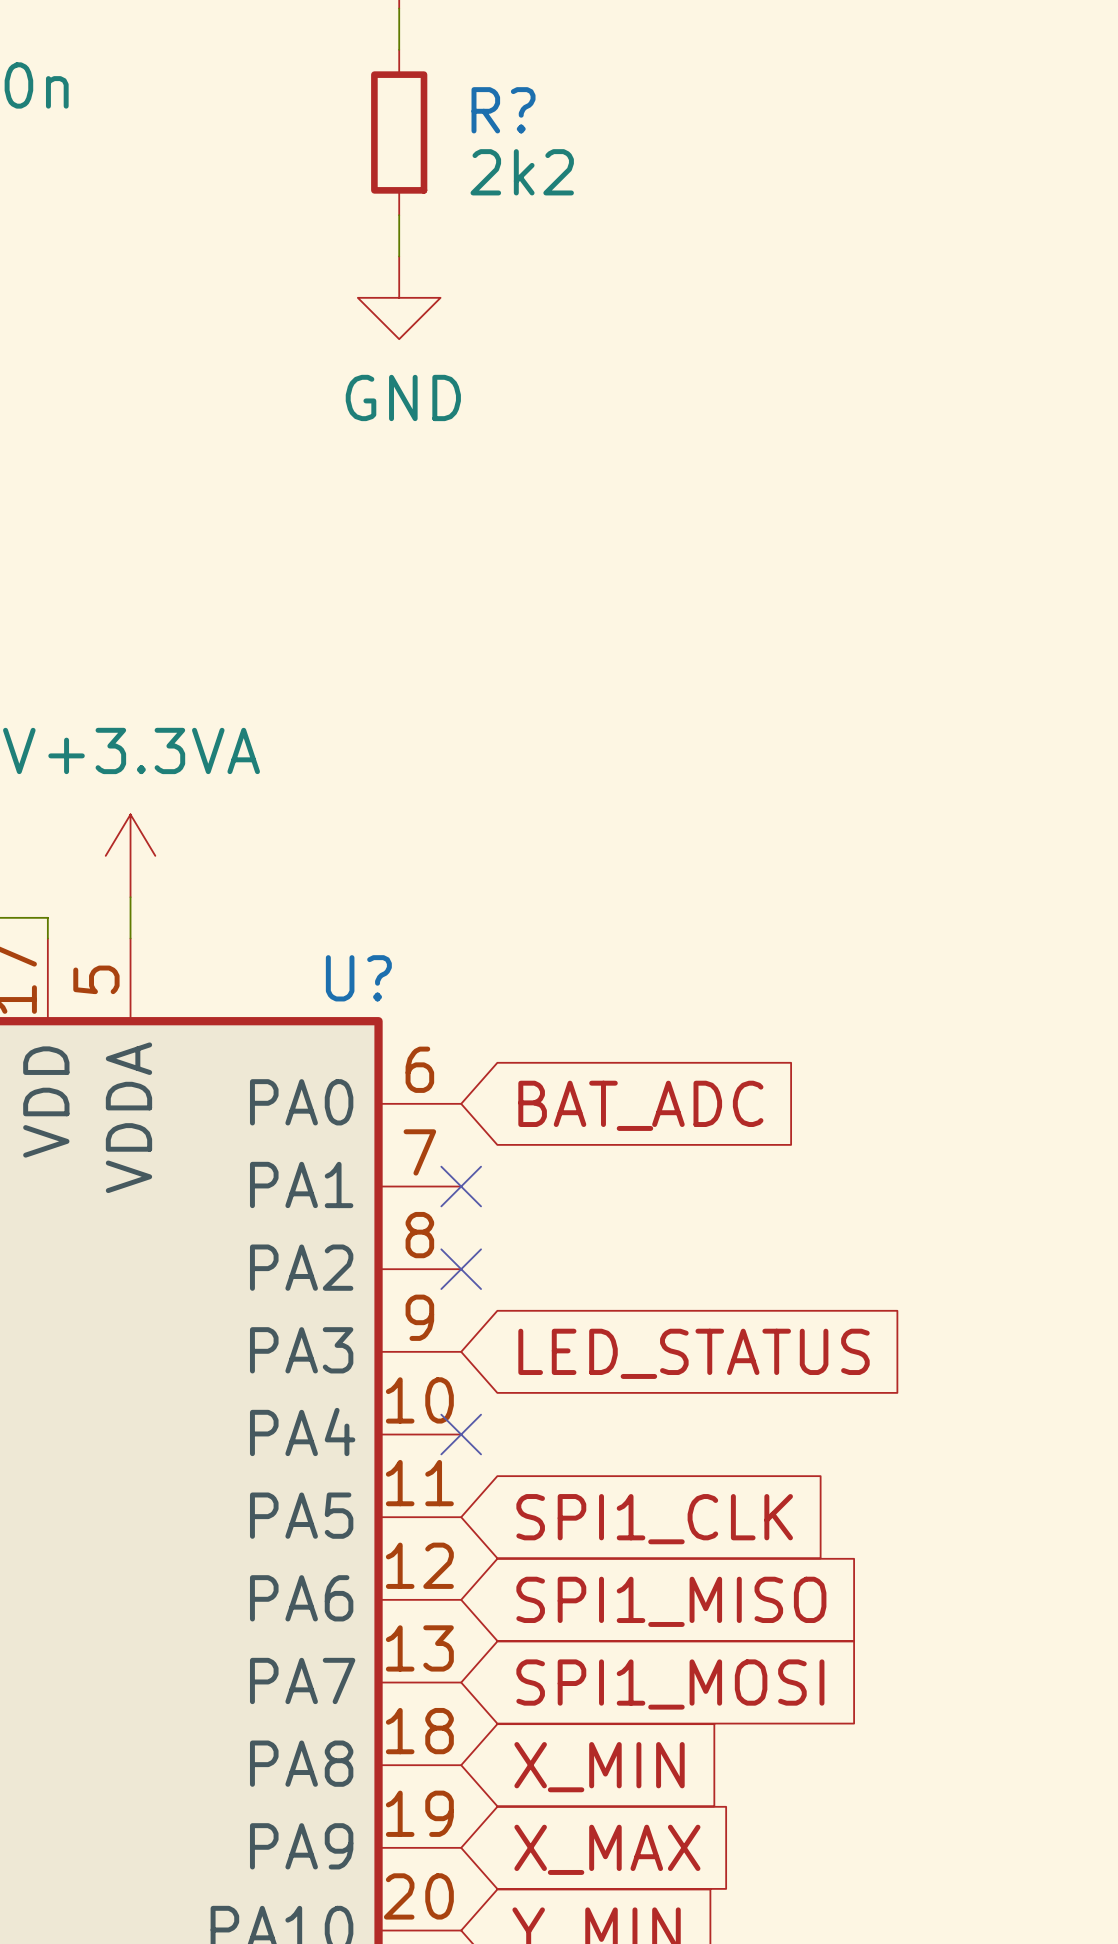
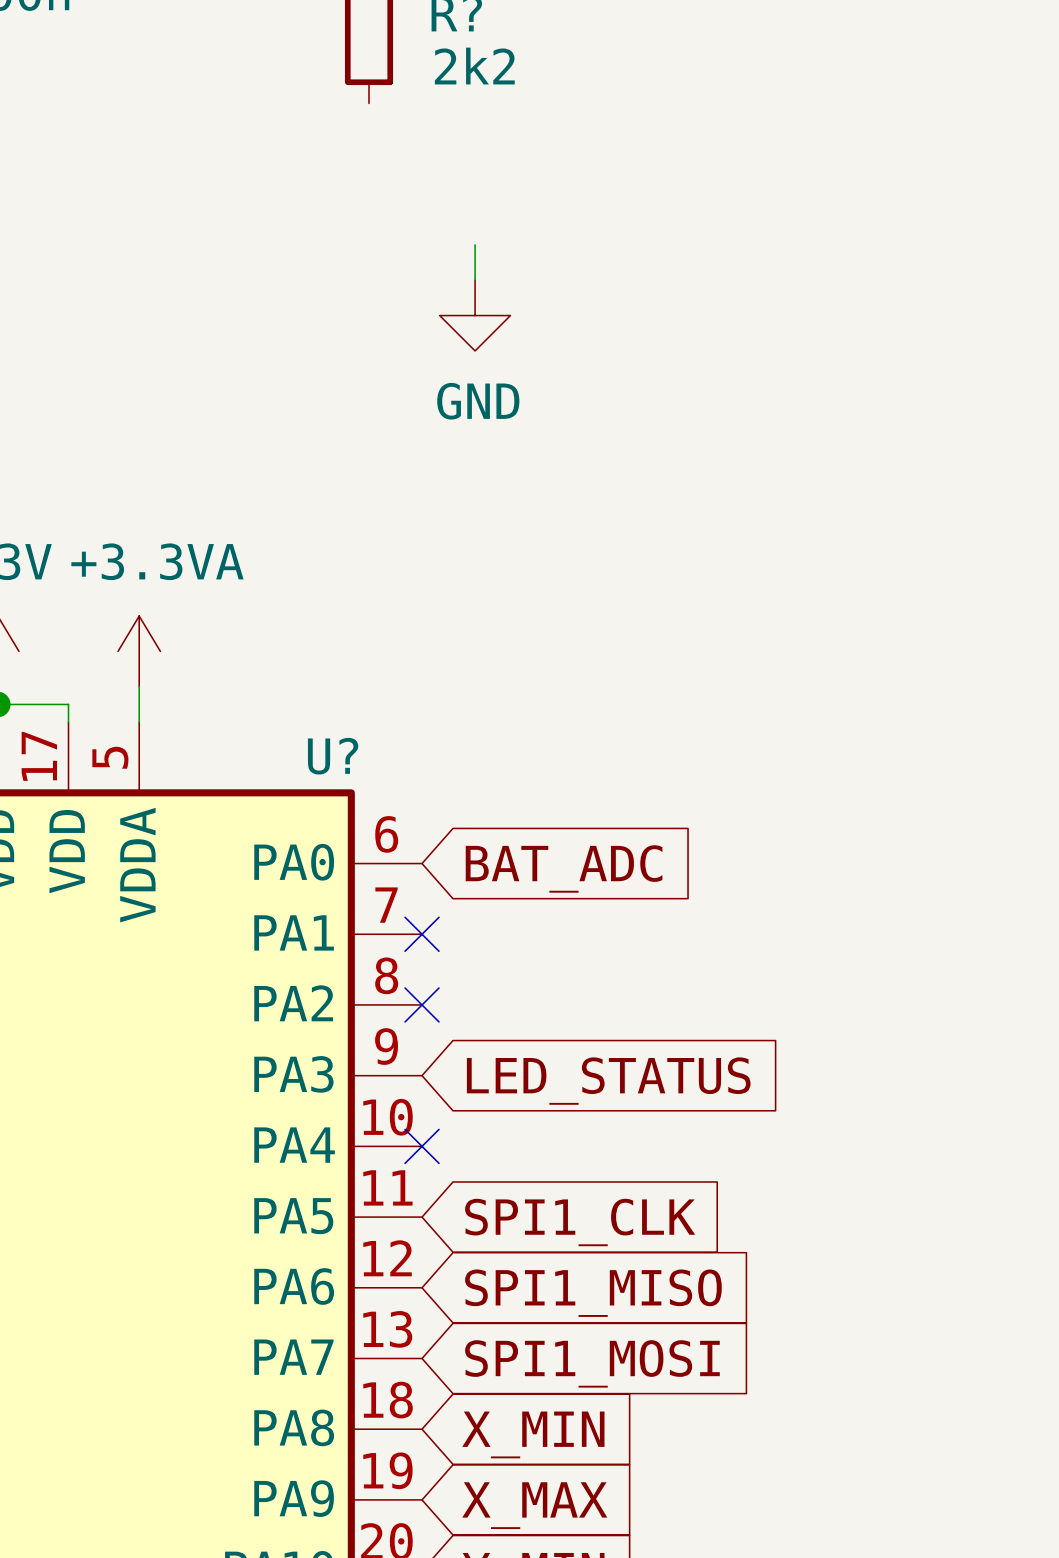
wire: (399, 215) (399, 256) -> (475, 244) (475, 280)
power symbol position: GND (399, 297) -> GND (475, 315)

